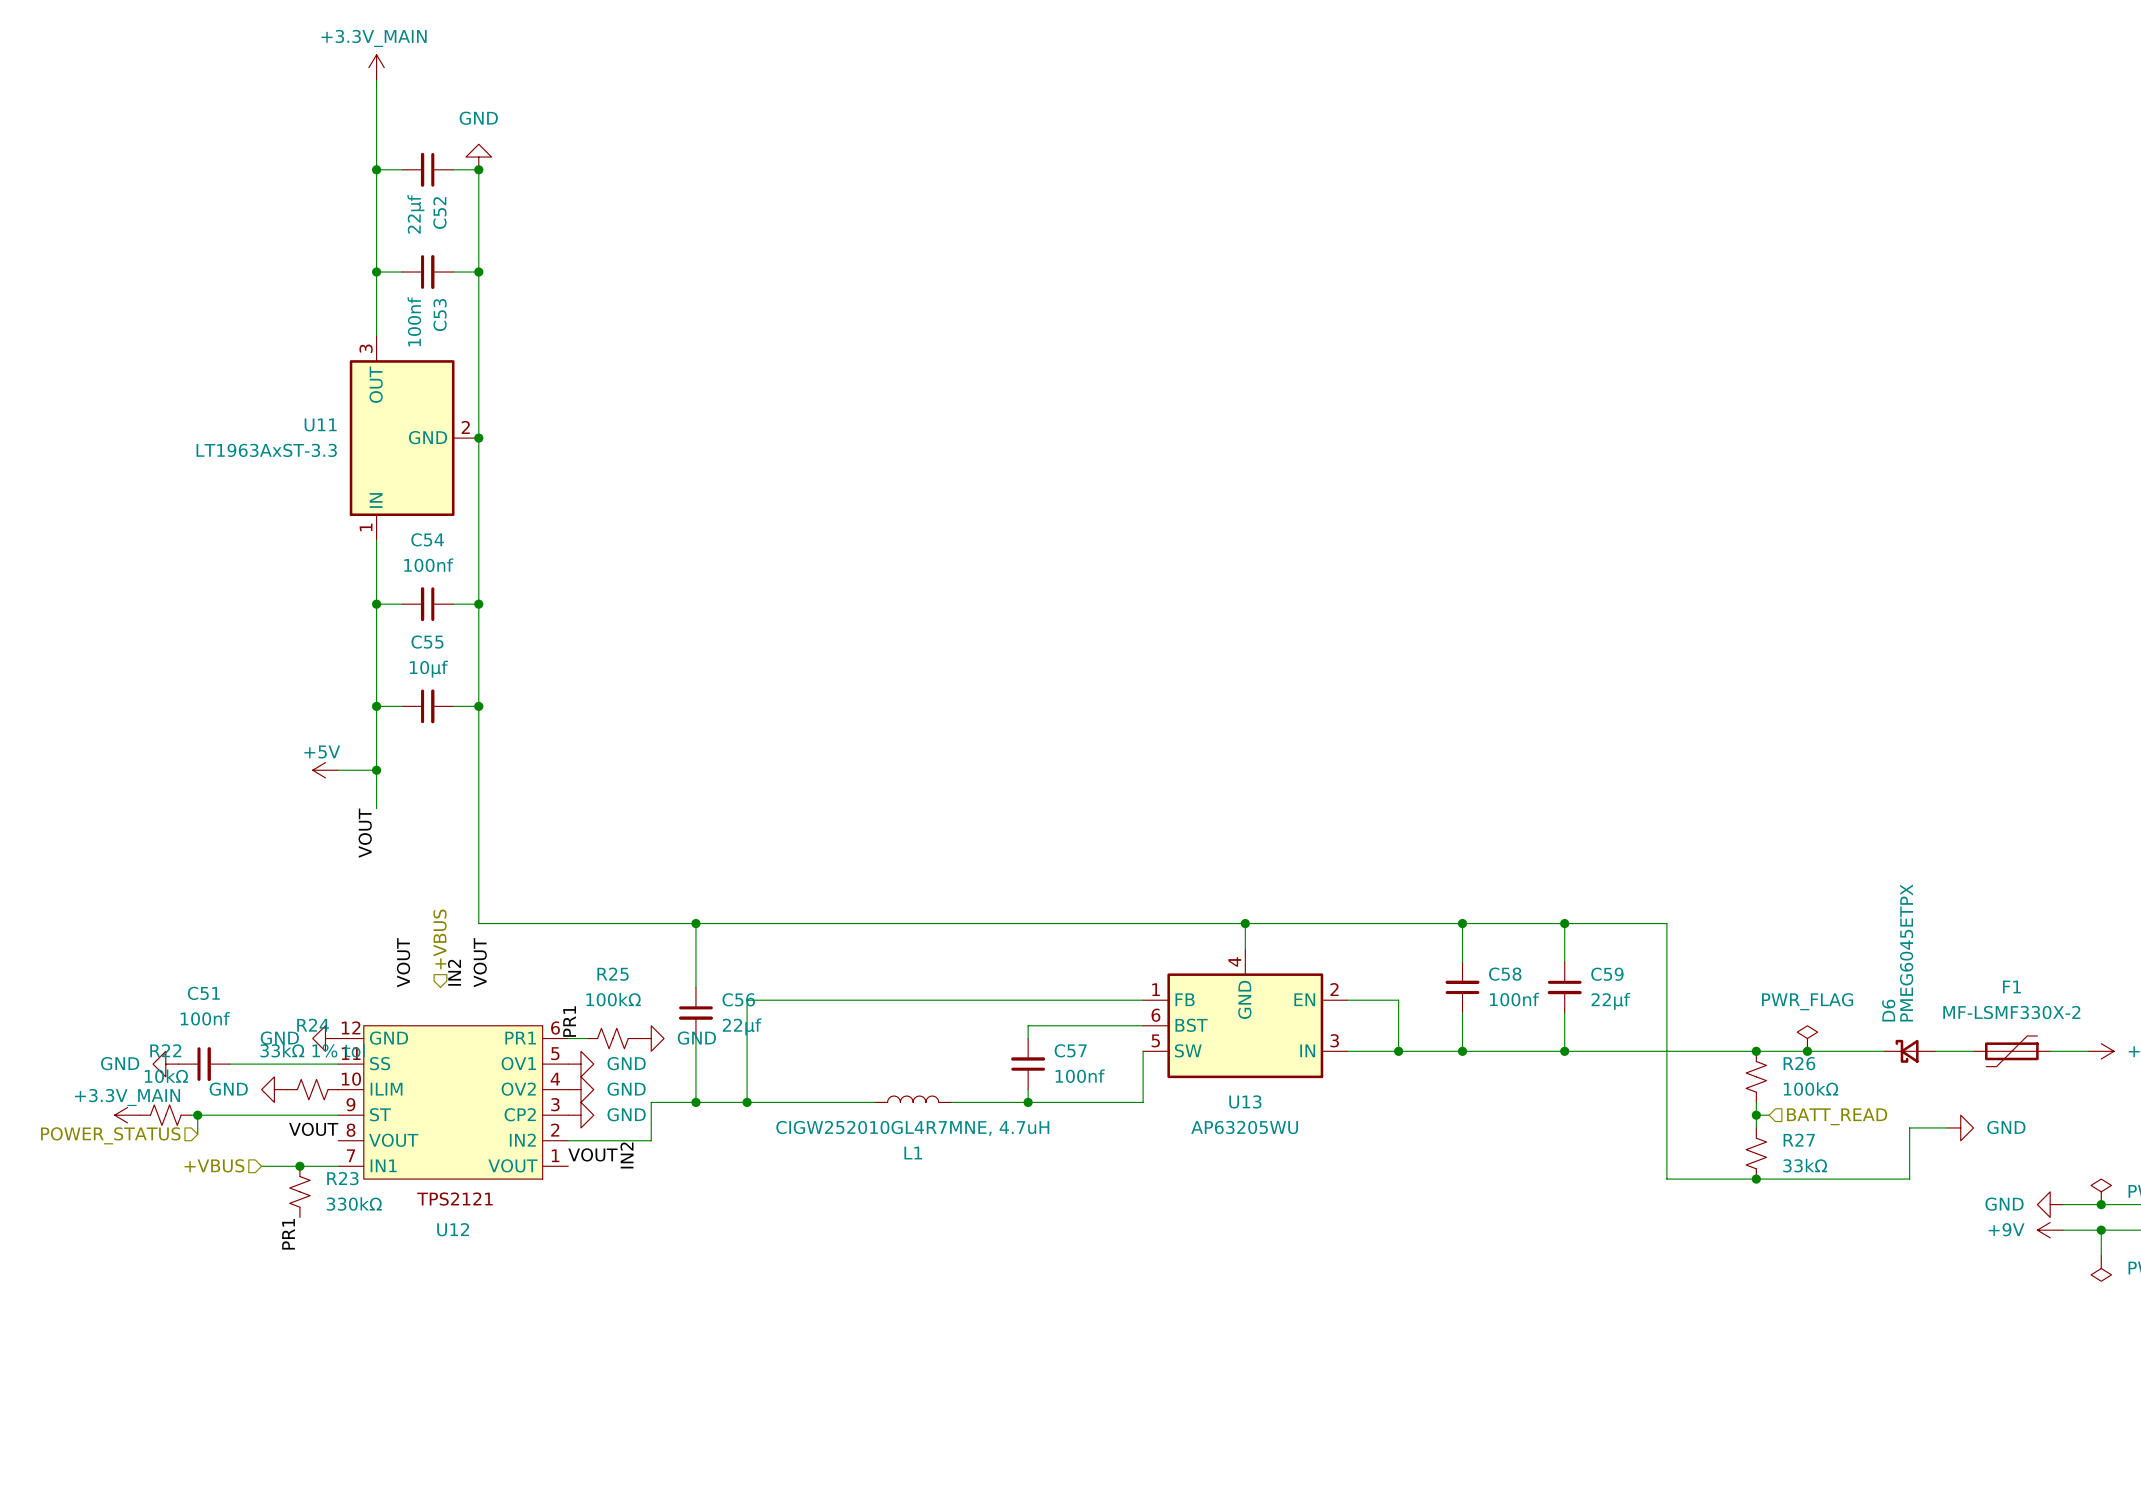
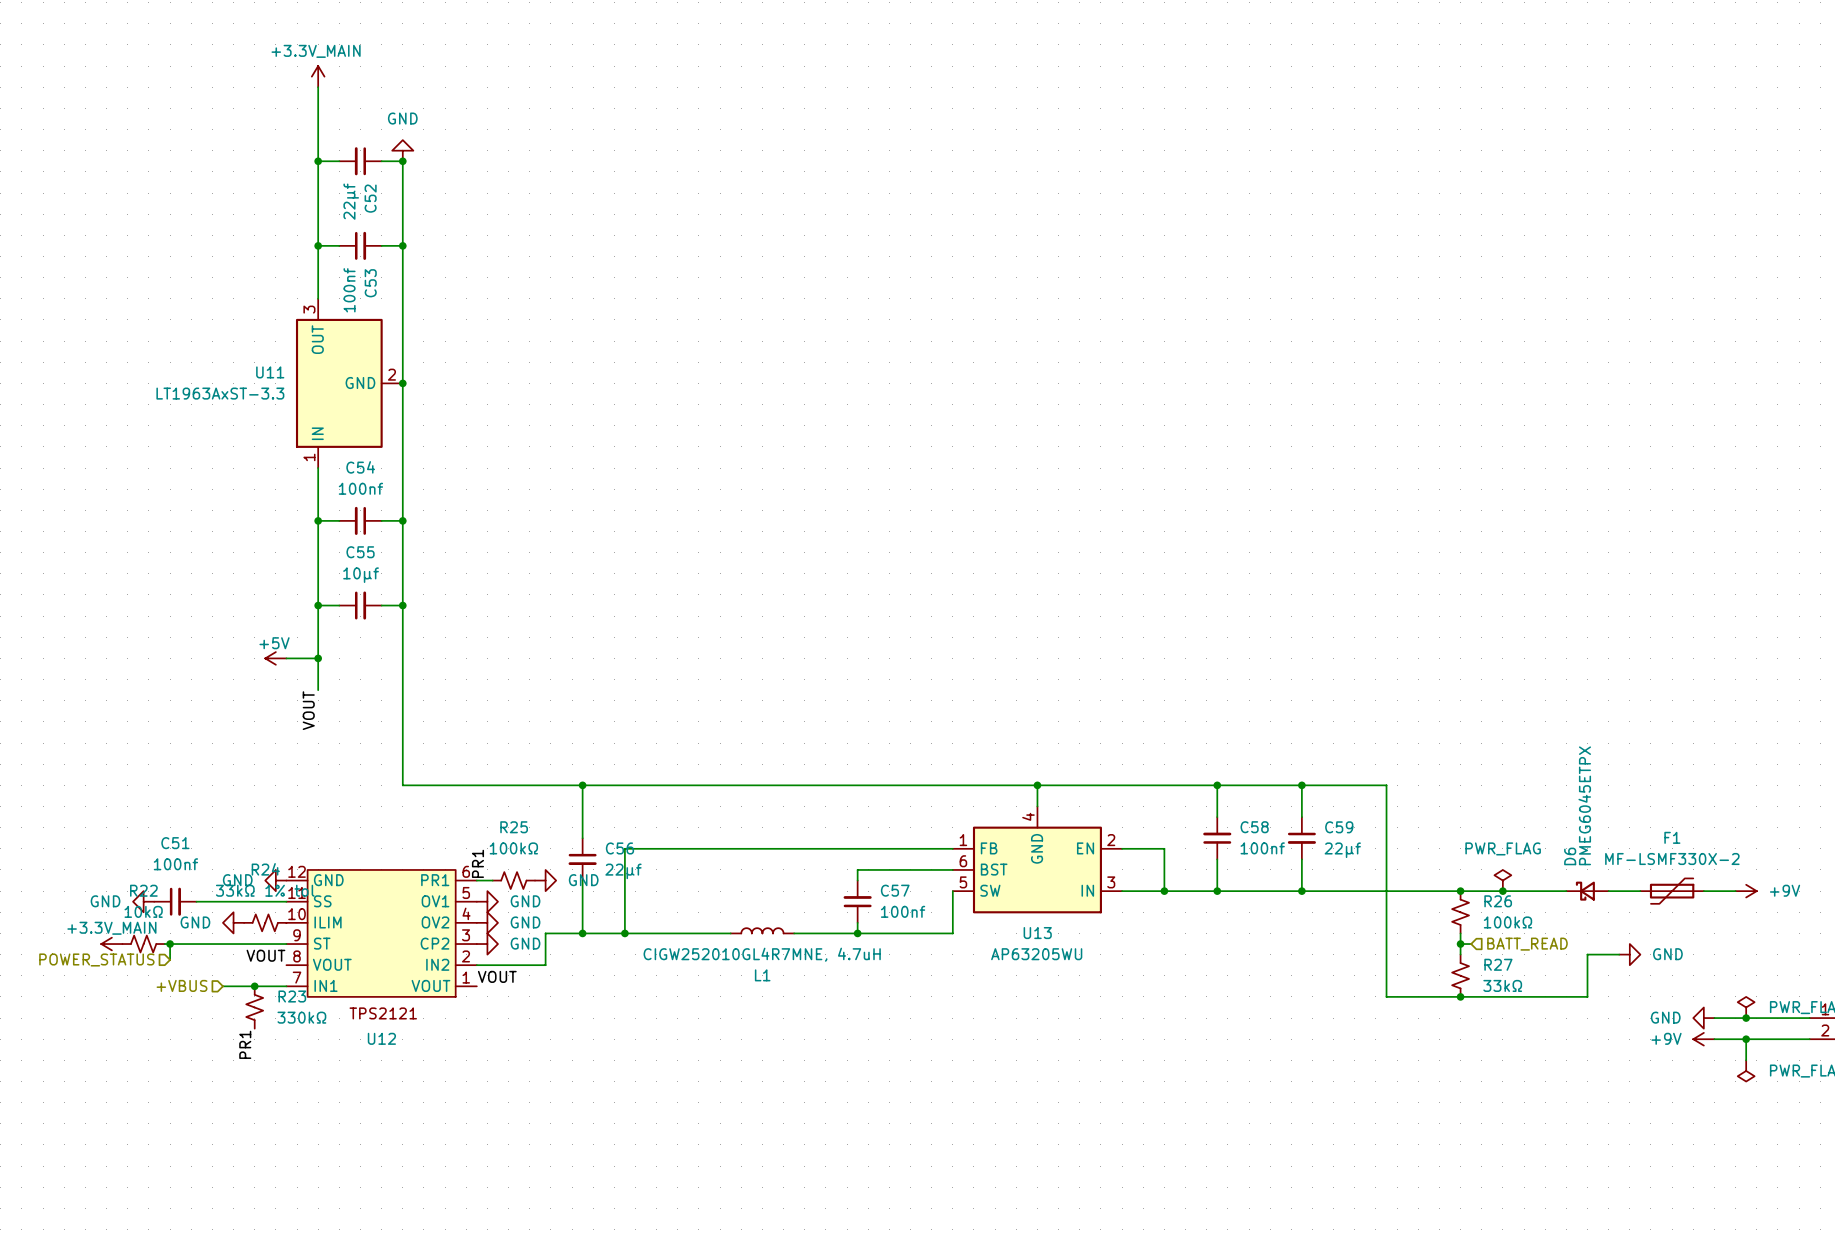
hierarchical label: +VBUS (439, 939) -> none
label: VOUT (403, 962) -> none
label: VOUT (480, 962) -> none
label: IN2 (454, 972) -> none
label: IN2 (626, 1155) -> none

